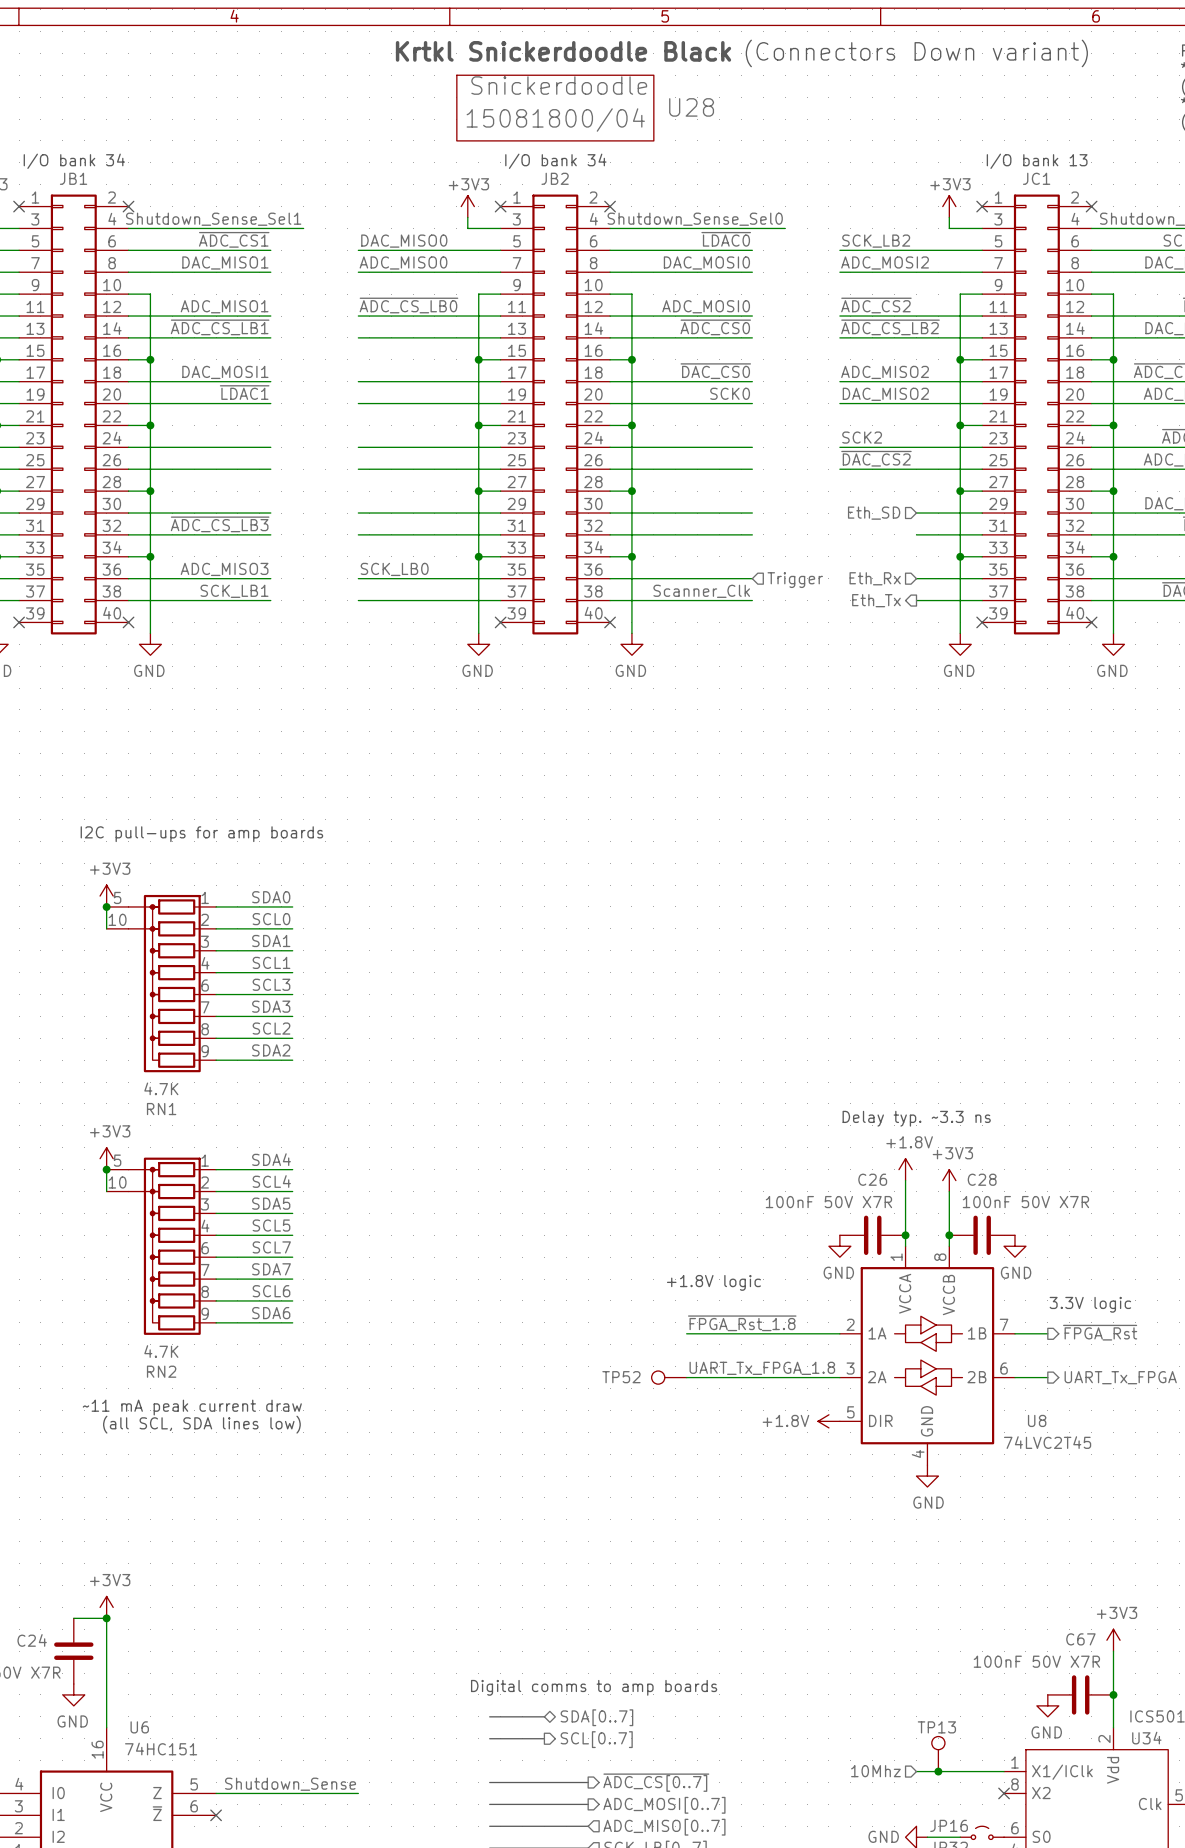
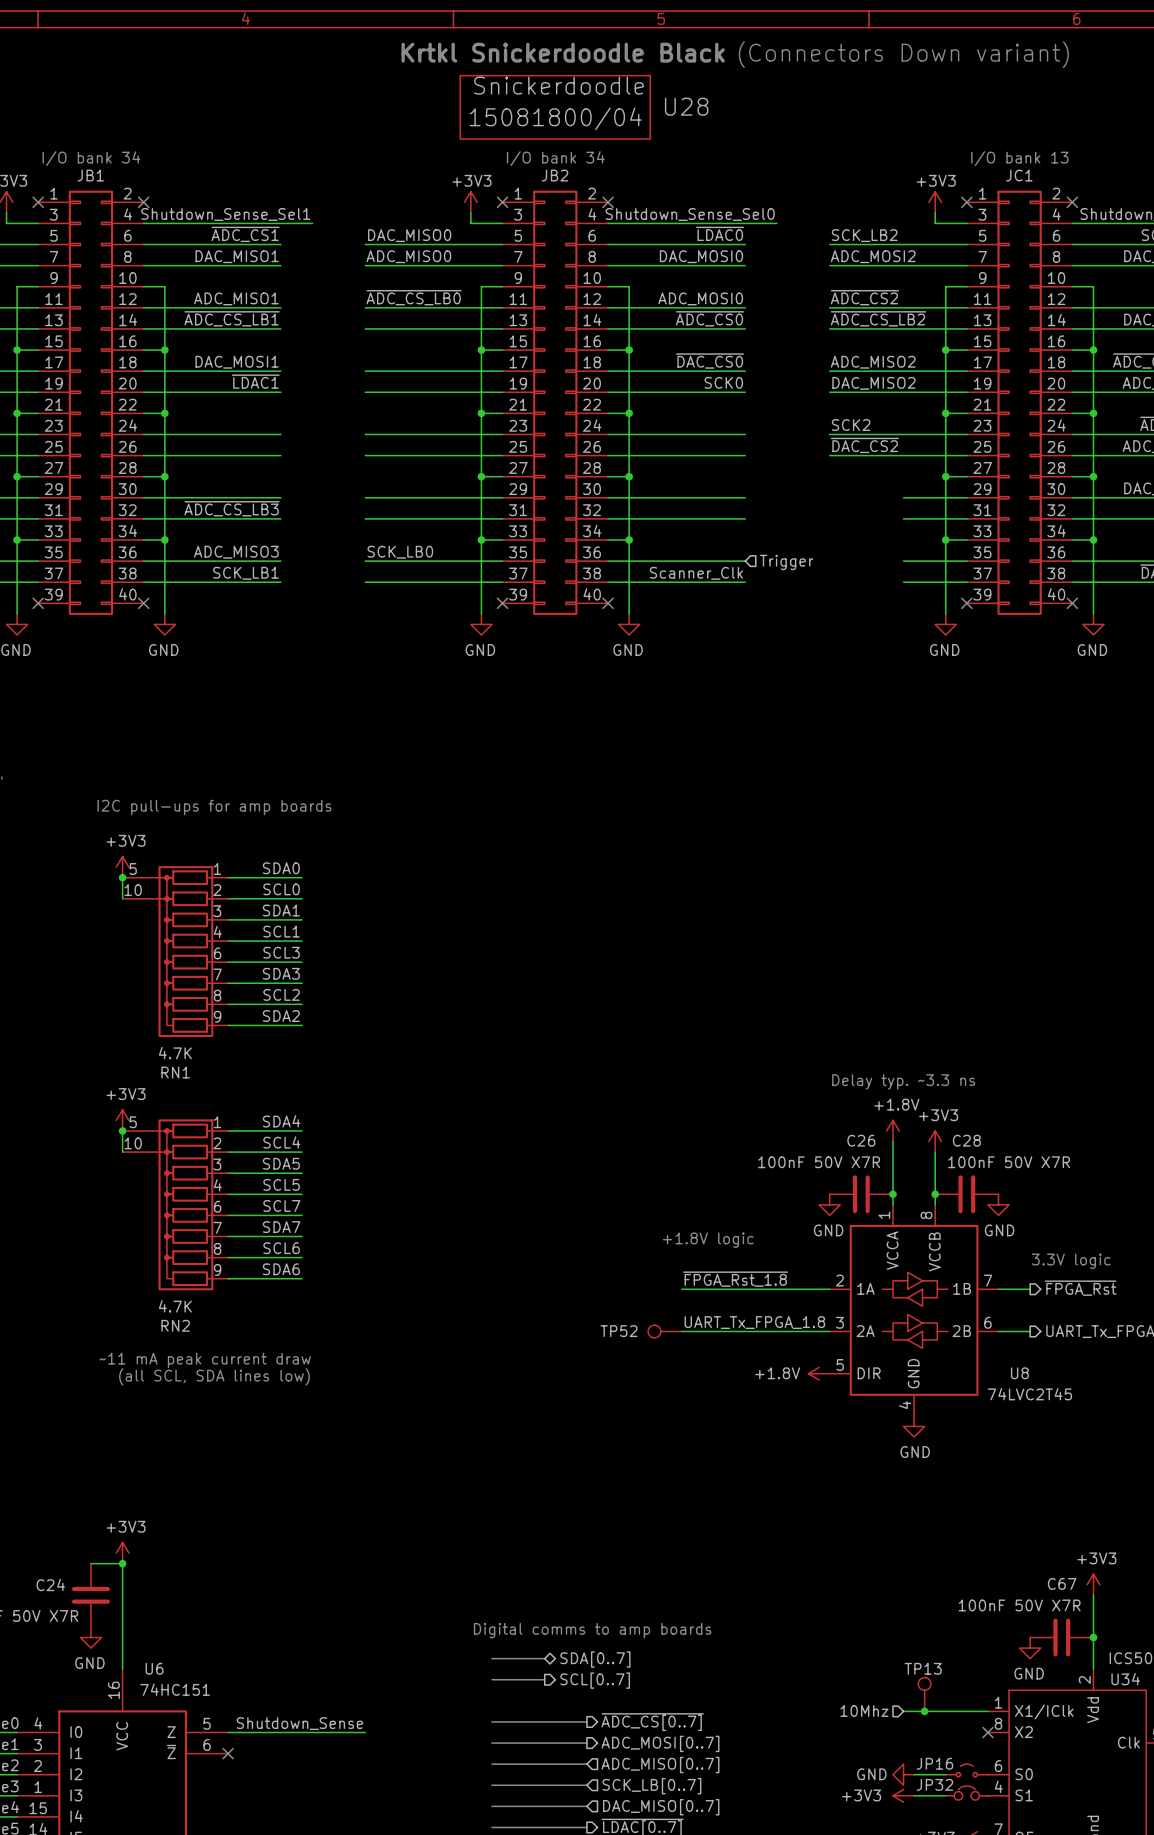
hierarchical label: Eth_SD (874, 513) -> none
hierarchical label: Eth_Rx (875, 578) -> none
hierarchical label: Eth_Tx (876, 600) -> none

